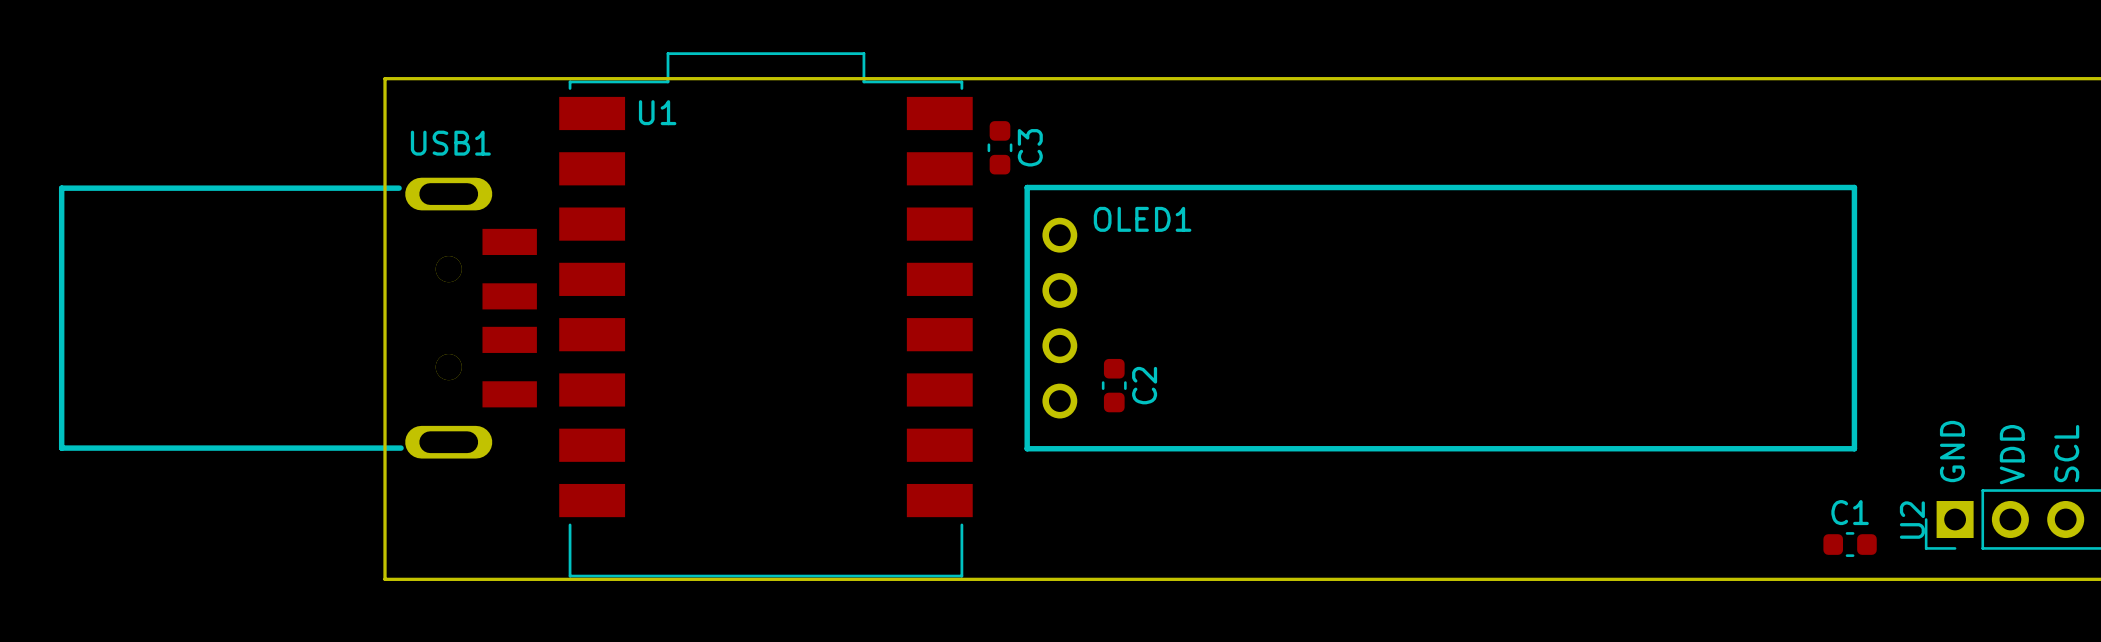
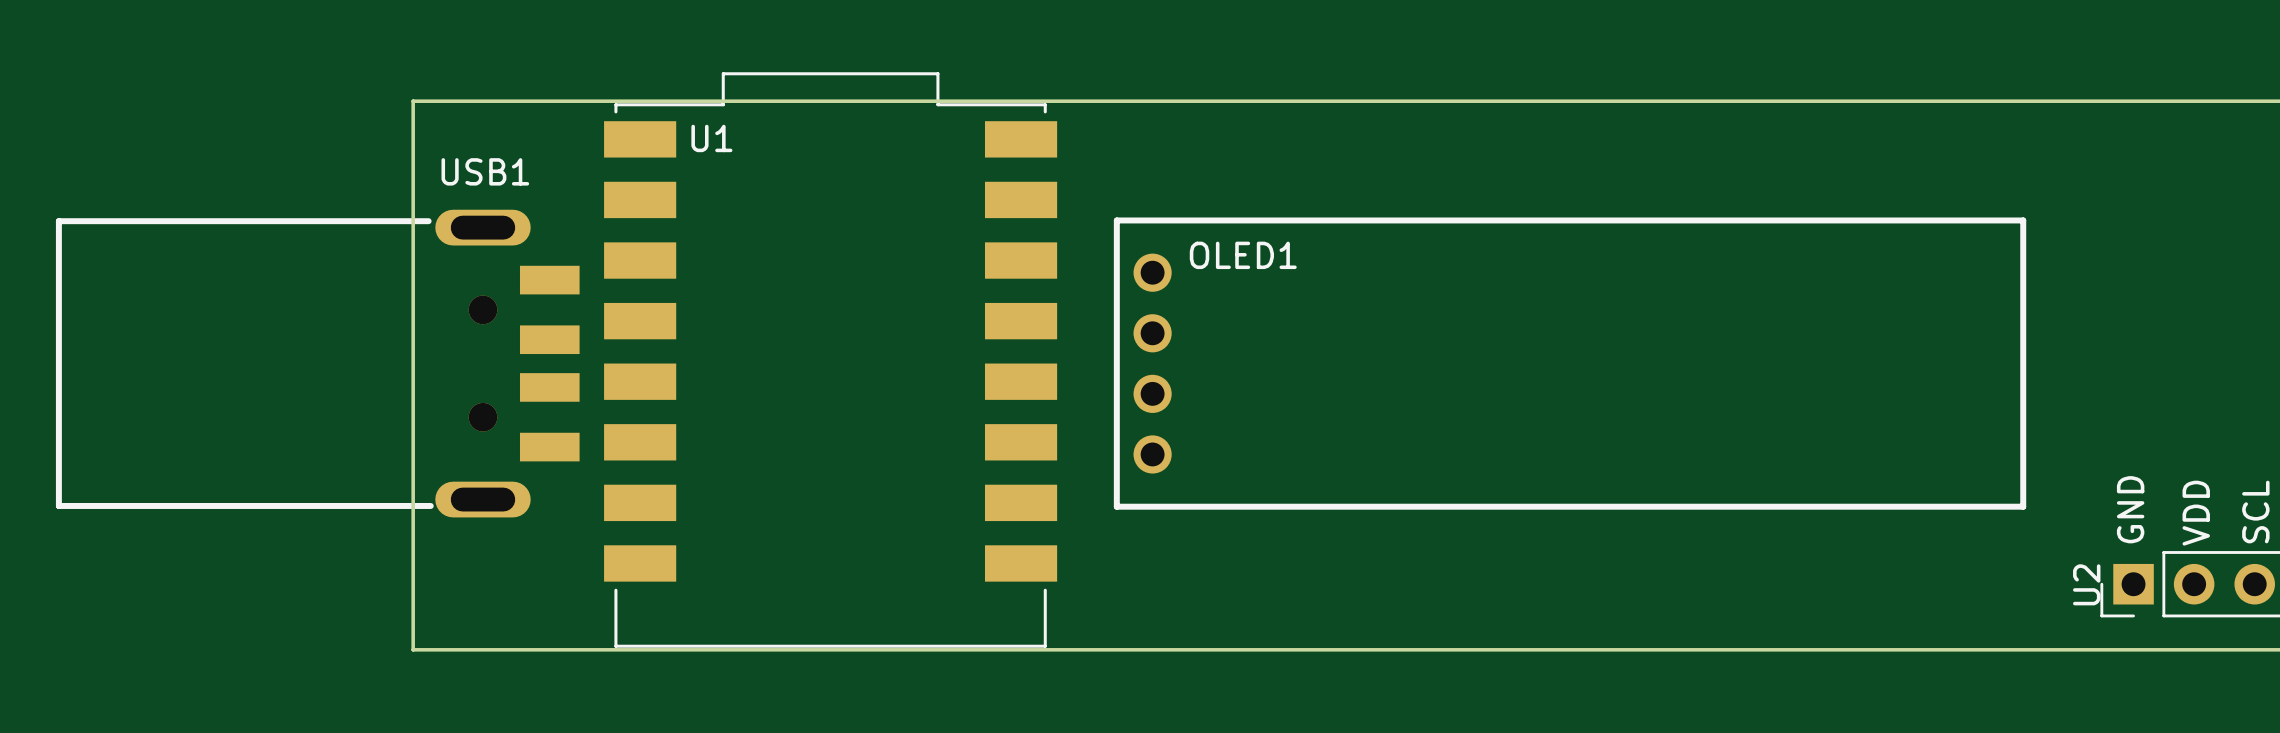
C3: (999, 147) -> none
C2: (1114, 385) -> none
C1: (1850, 544) -> none

